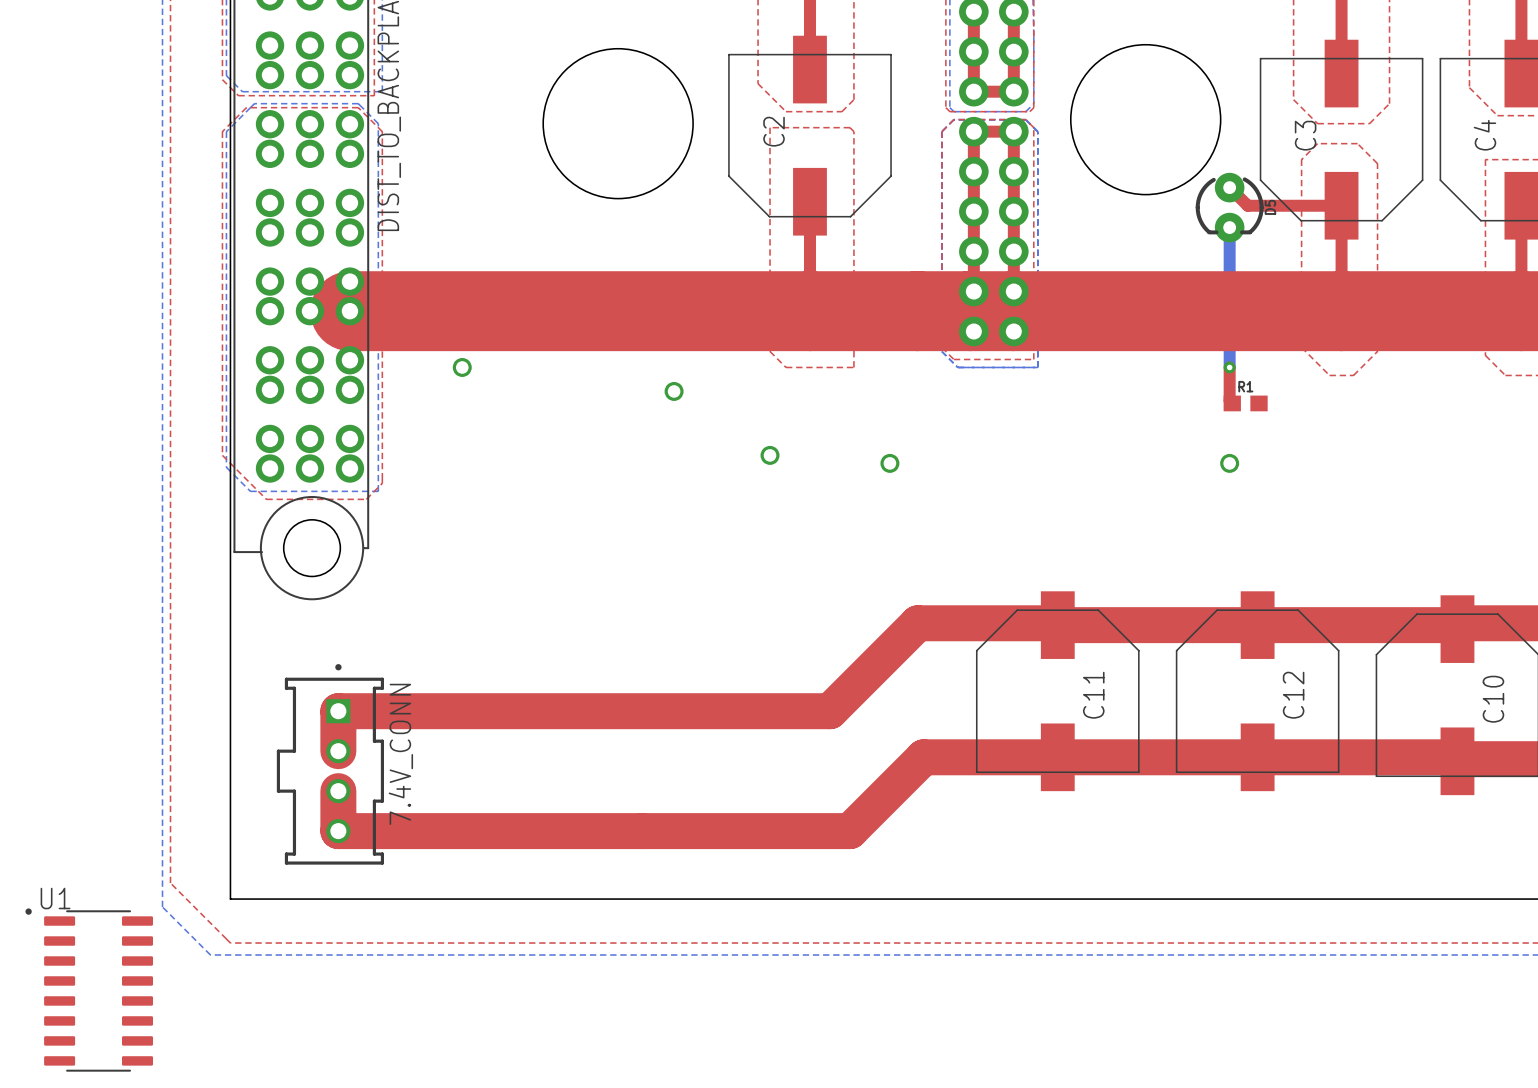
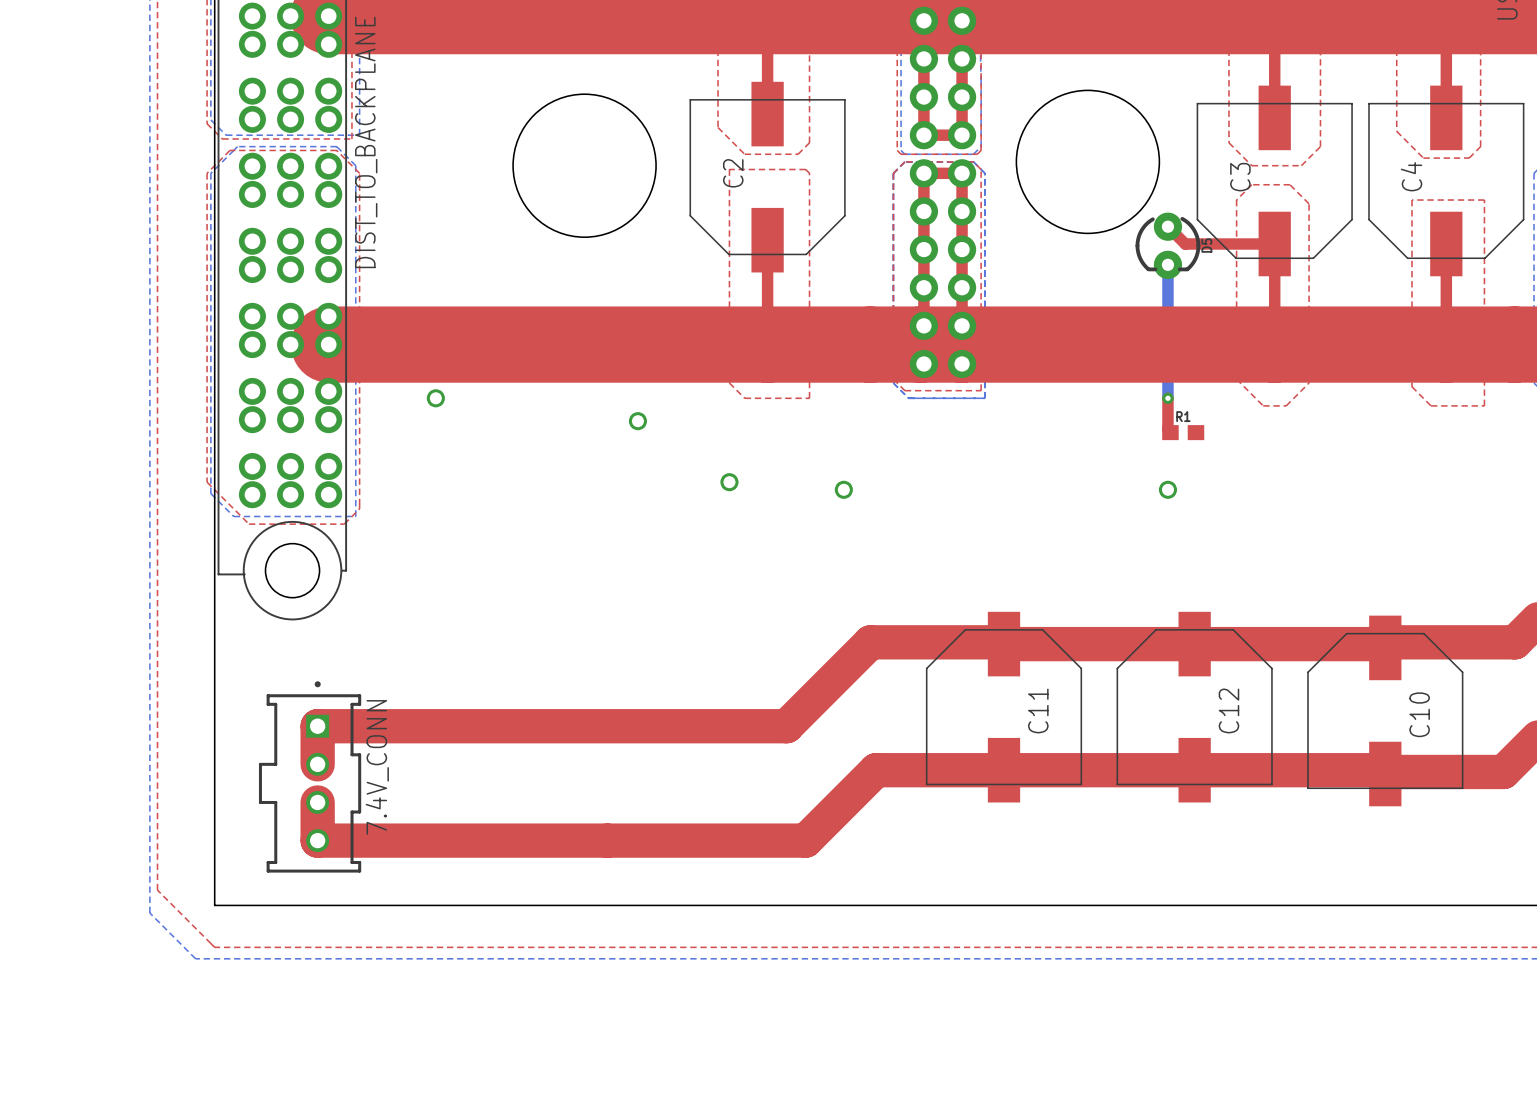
U1: (89, 990) -> none

